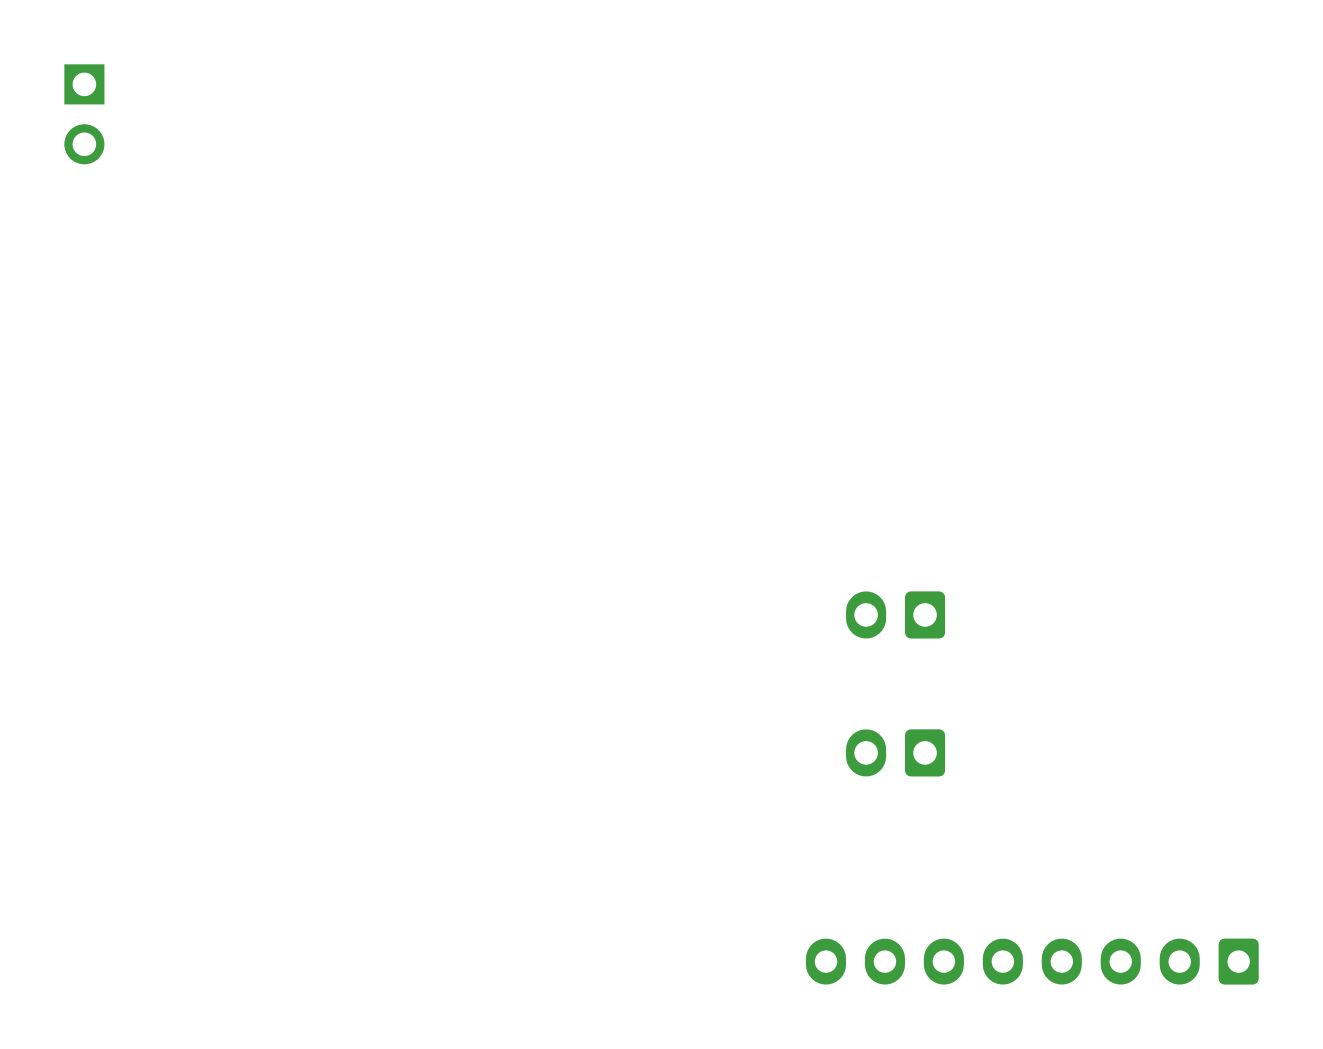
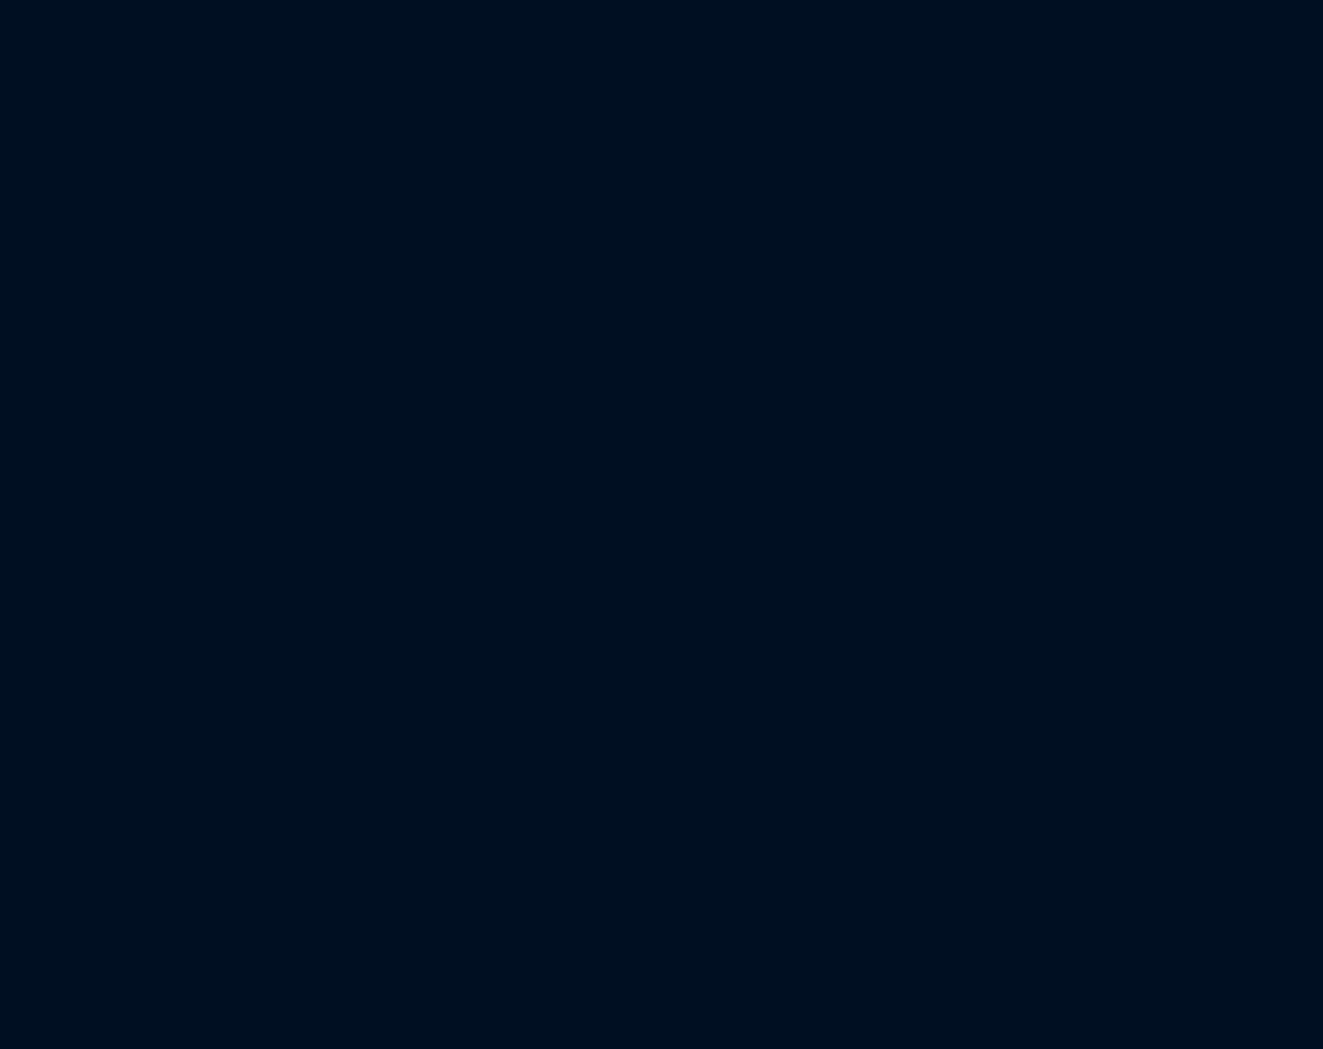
part: (84, 114) -> none
part: (895, 614) -> none
part: (895, 752) -> none
part: (1032, 961) -> none

